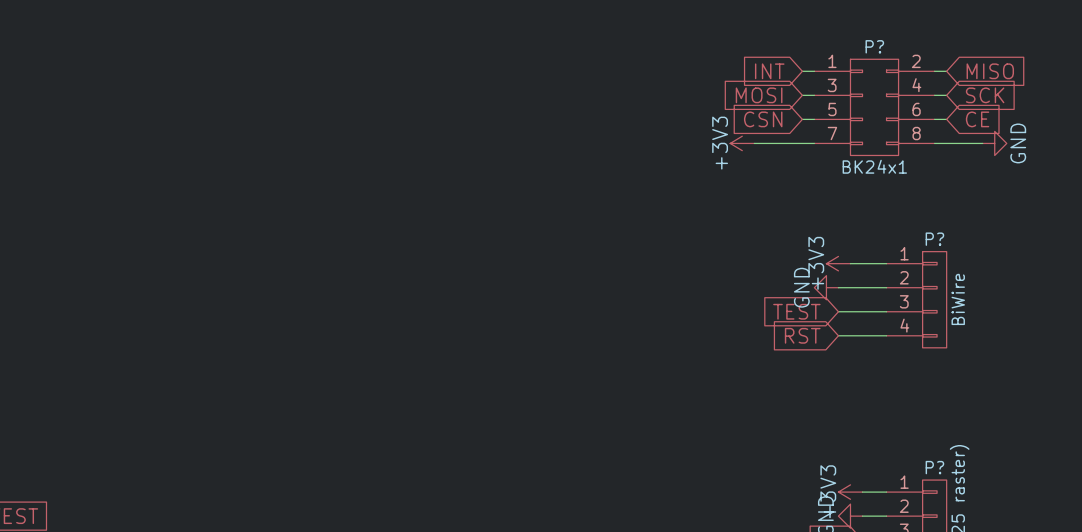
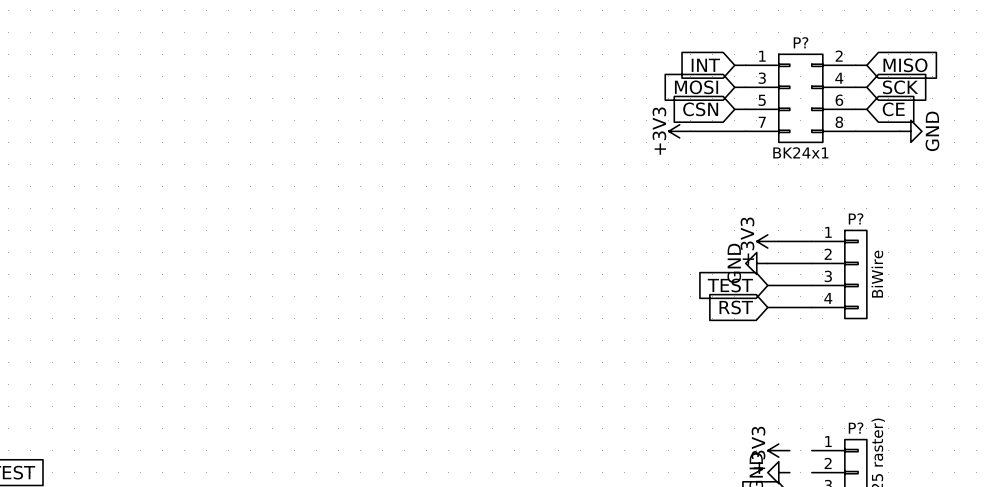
wire: (862, 492) (886, 492) -> none
wire: (862, 516) (886, 516) -> none

